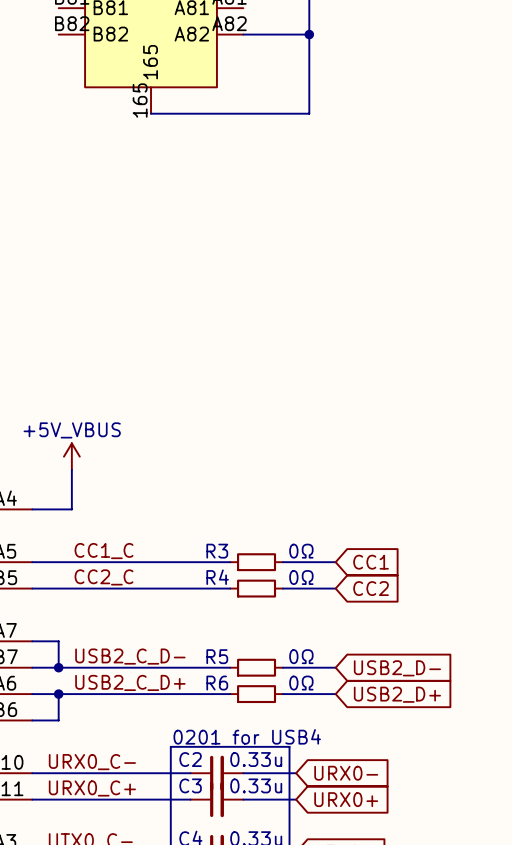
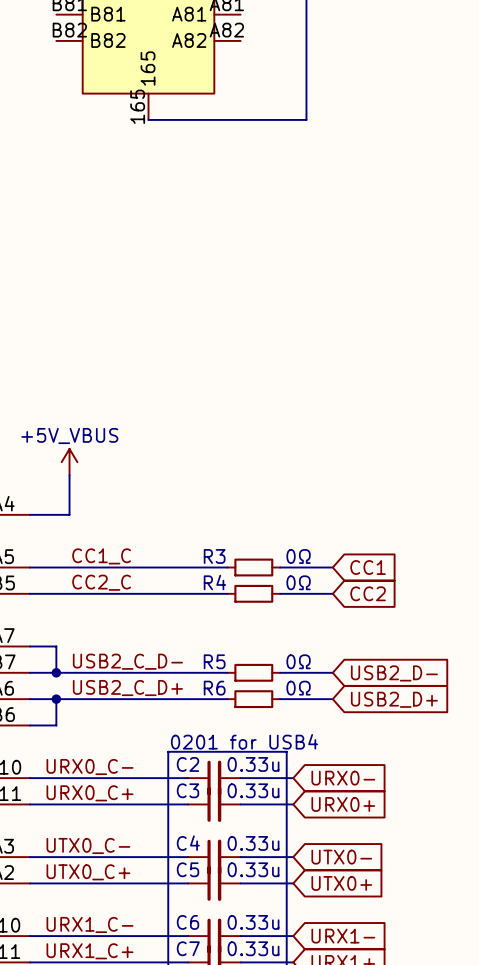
wire: (243, 34) (309, 34) -> none
junction: (309, 34) -> none

